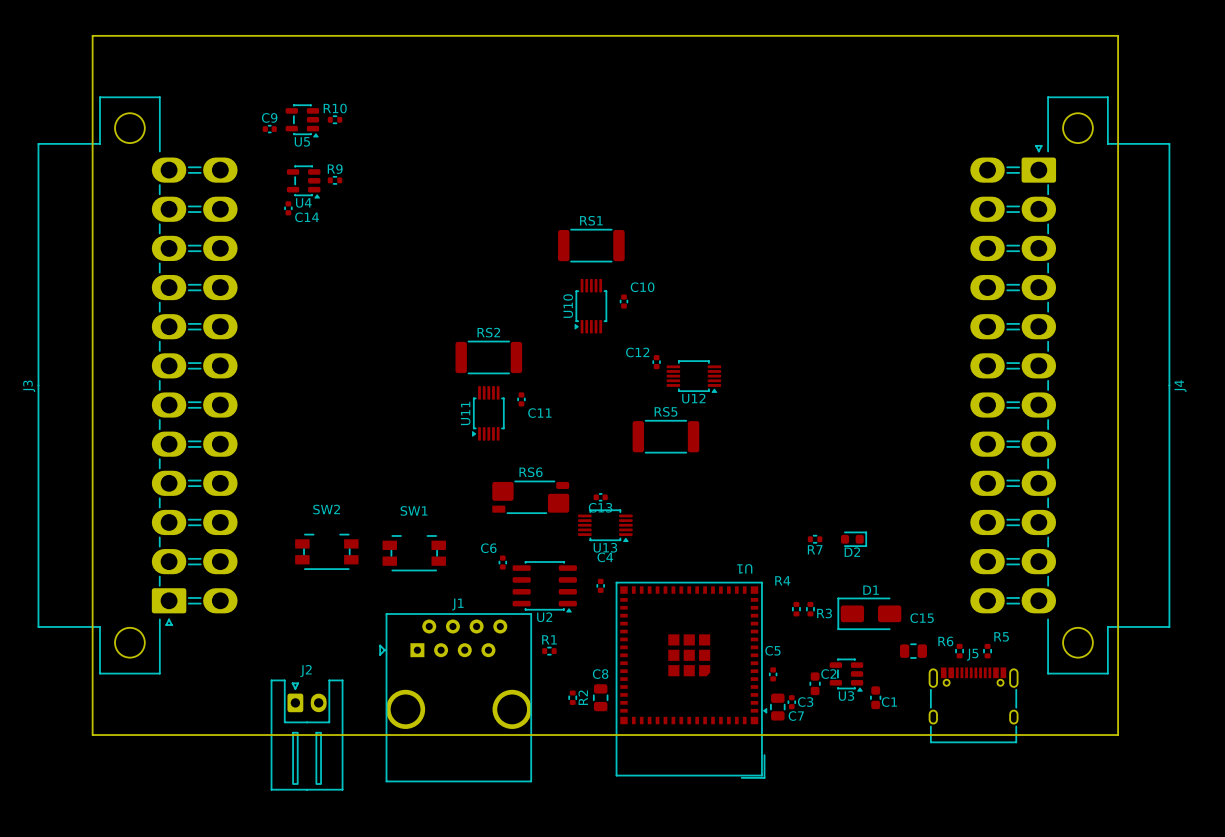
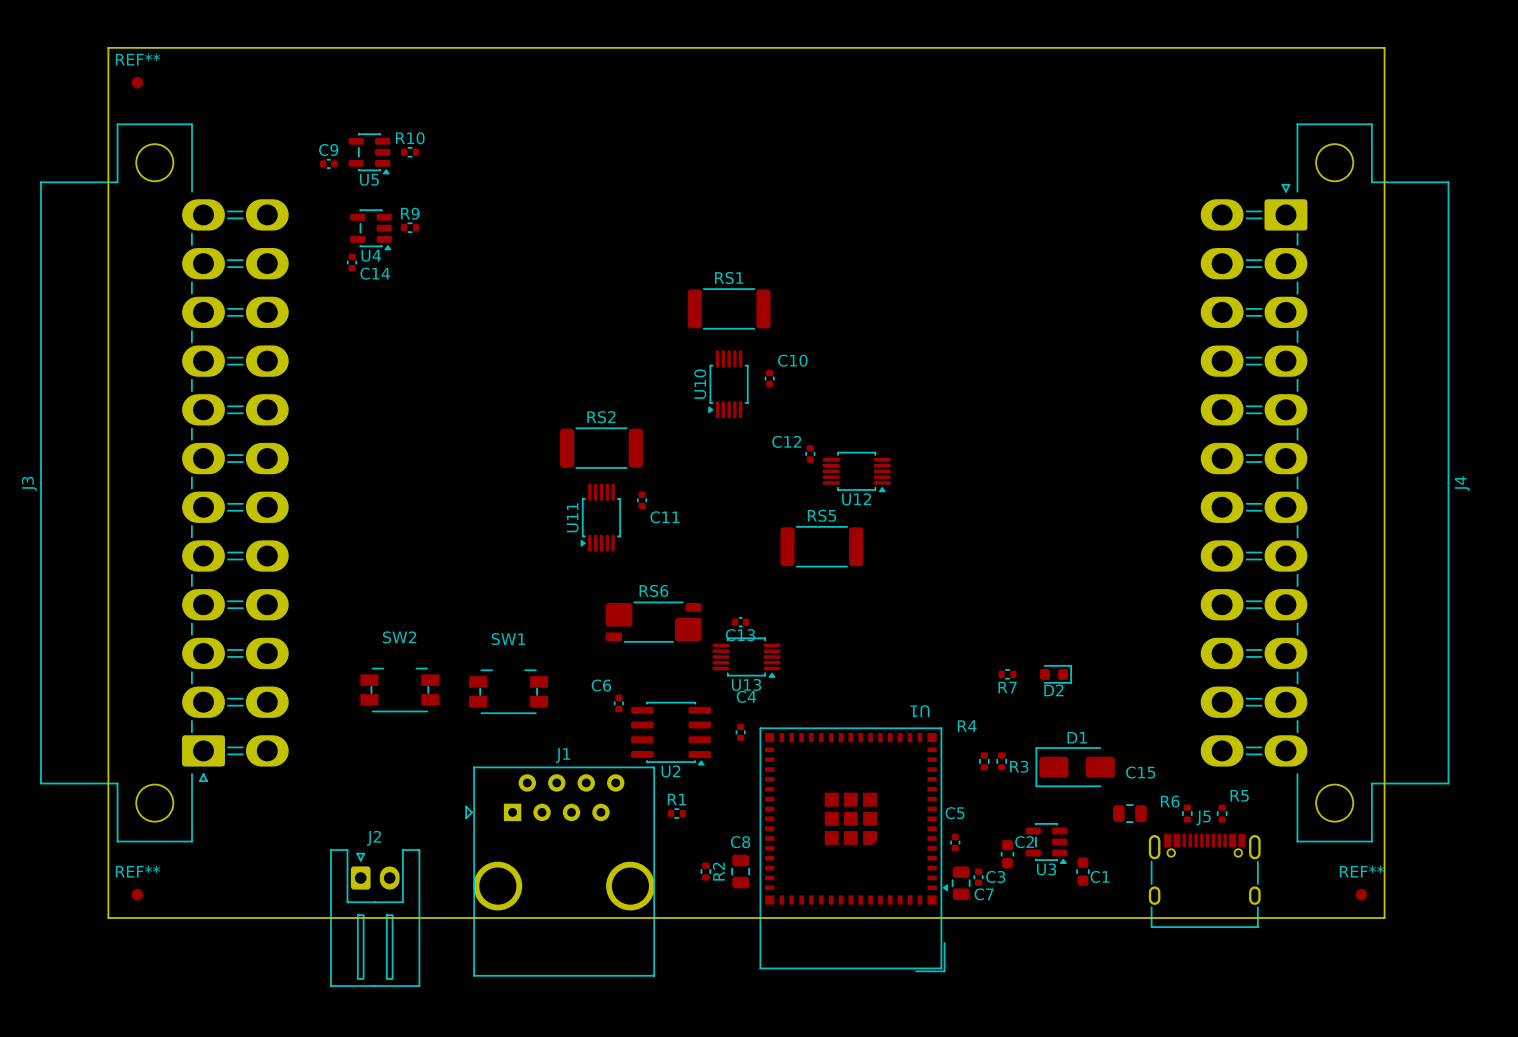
REF**: none -> (137, 82)
REF**: none -> (137, 894)
REF**: none -> (1361, 894)

